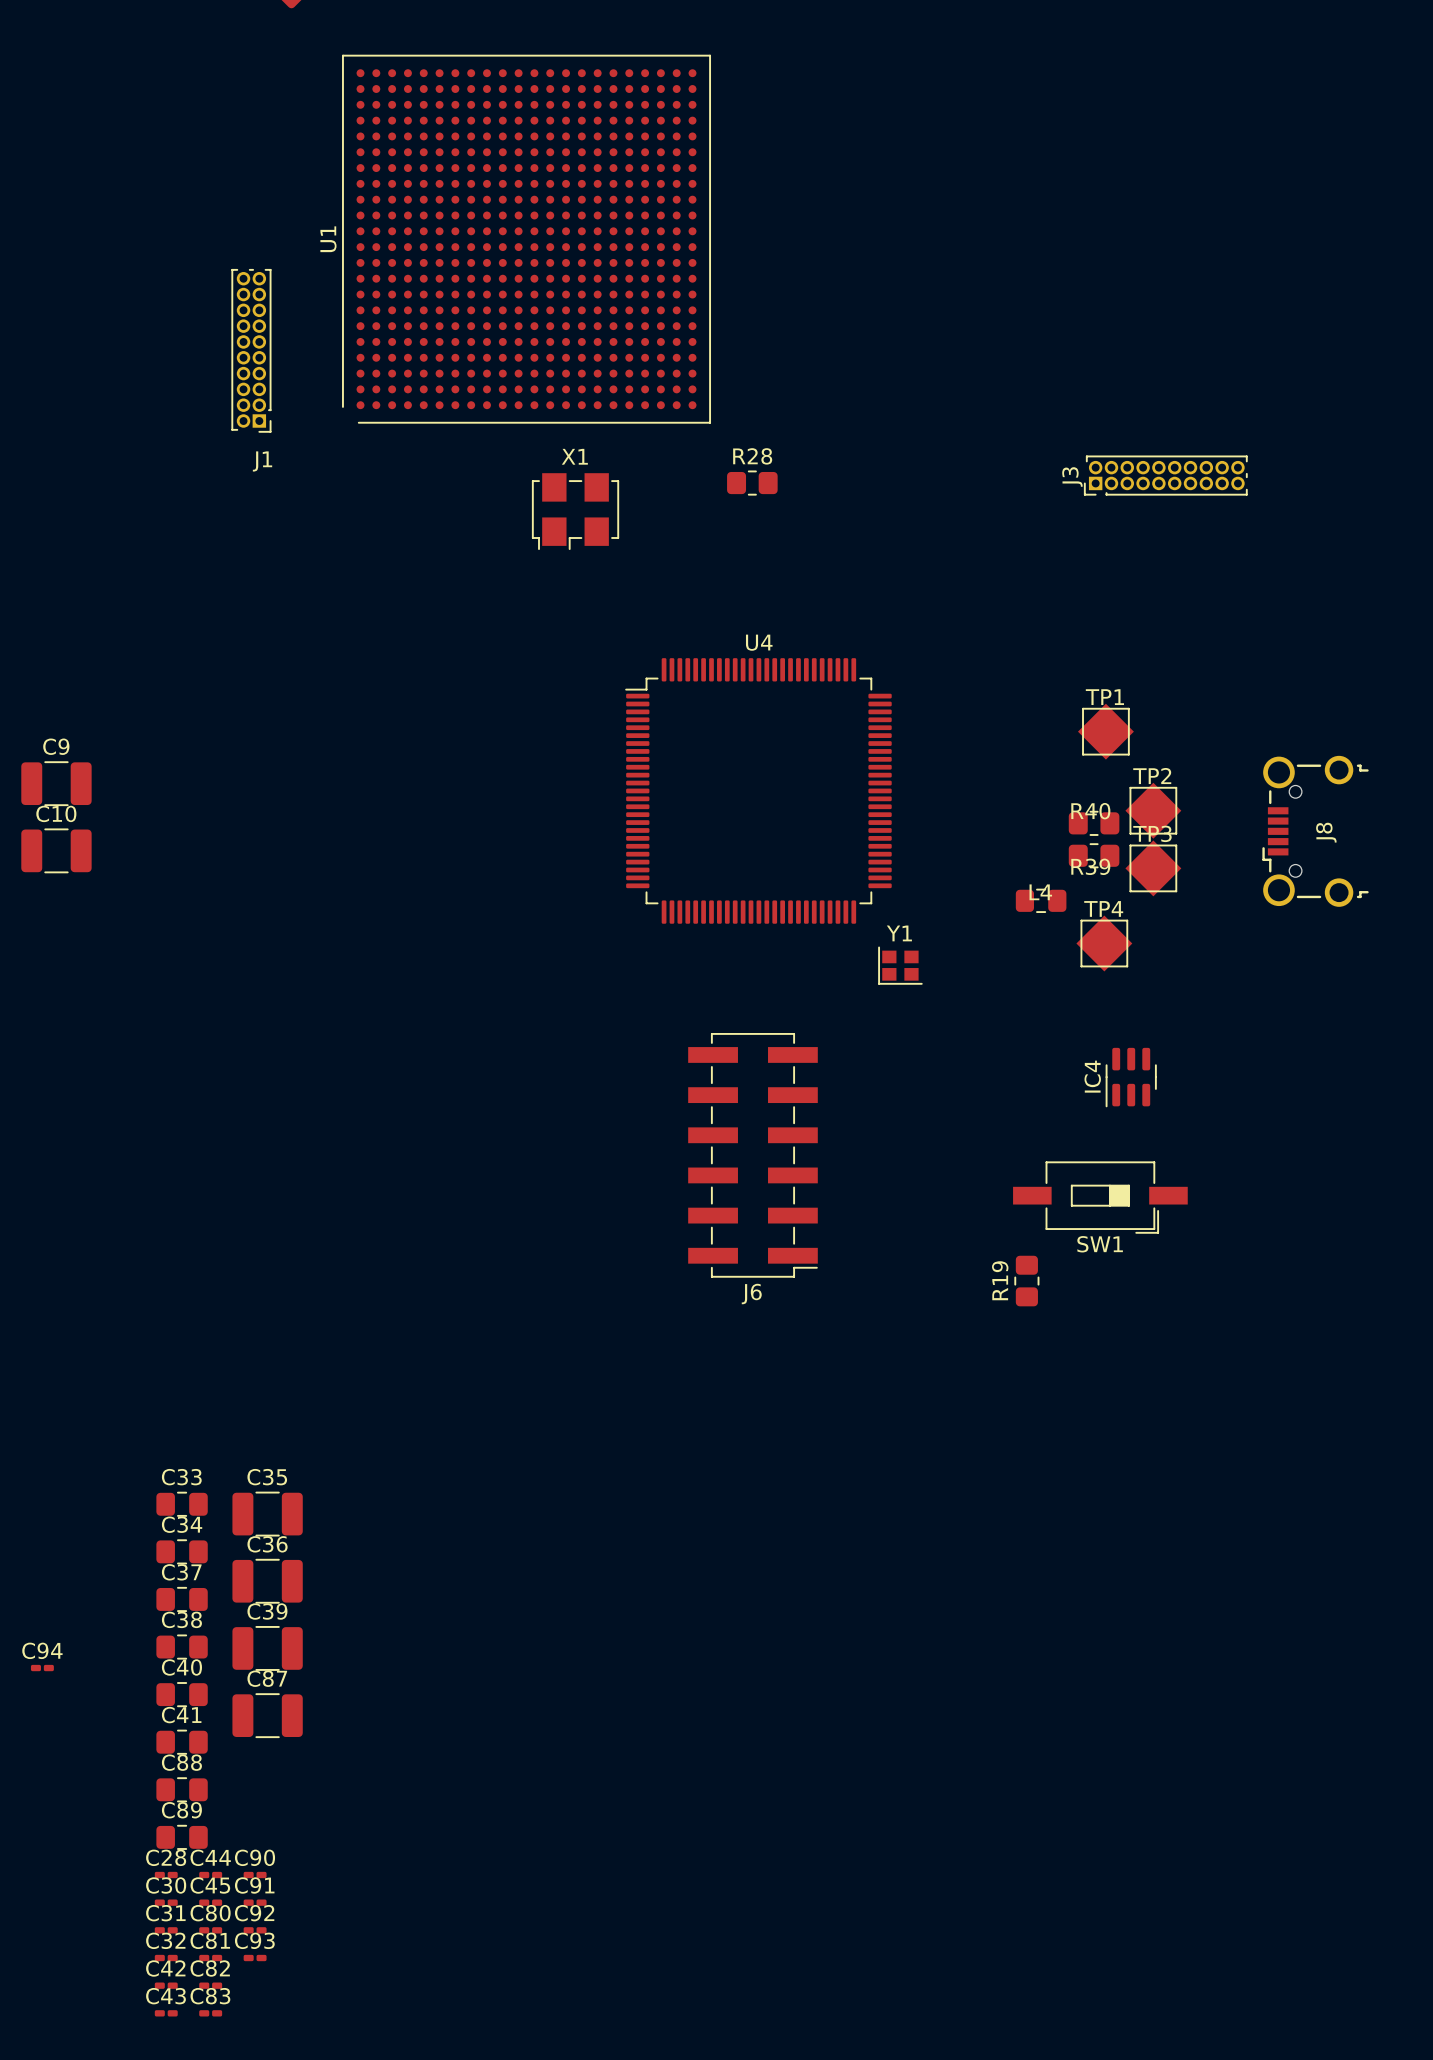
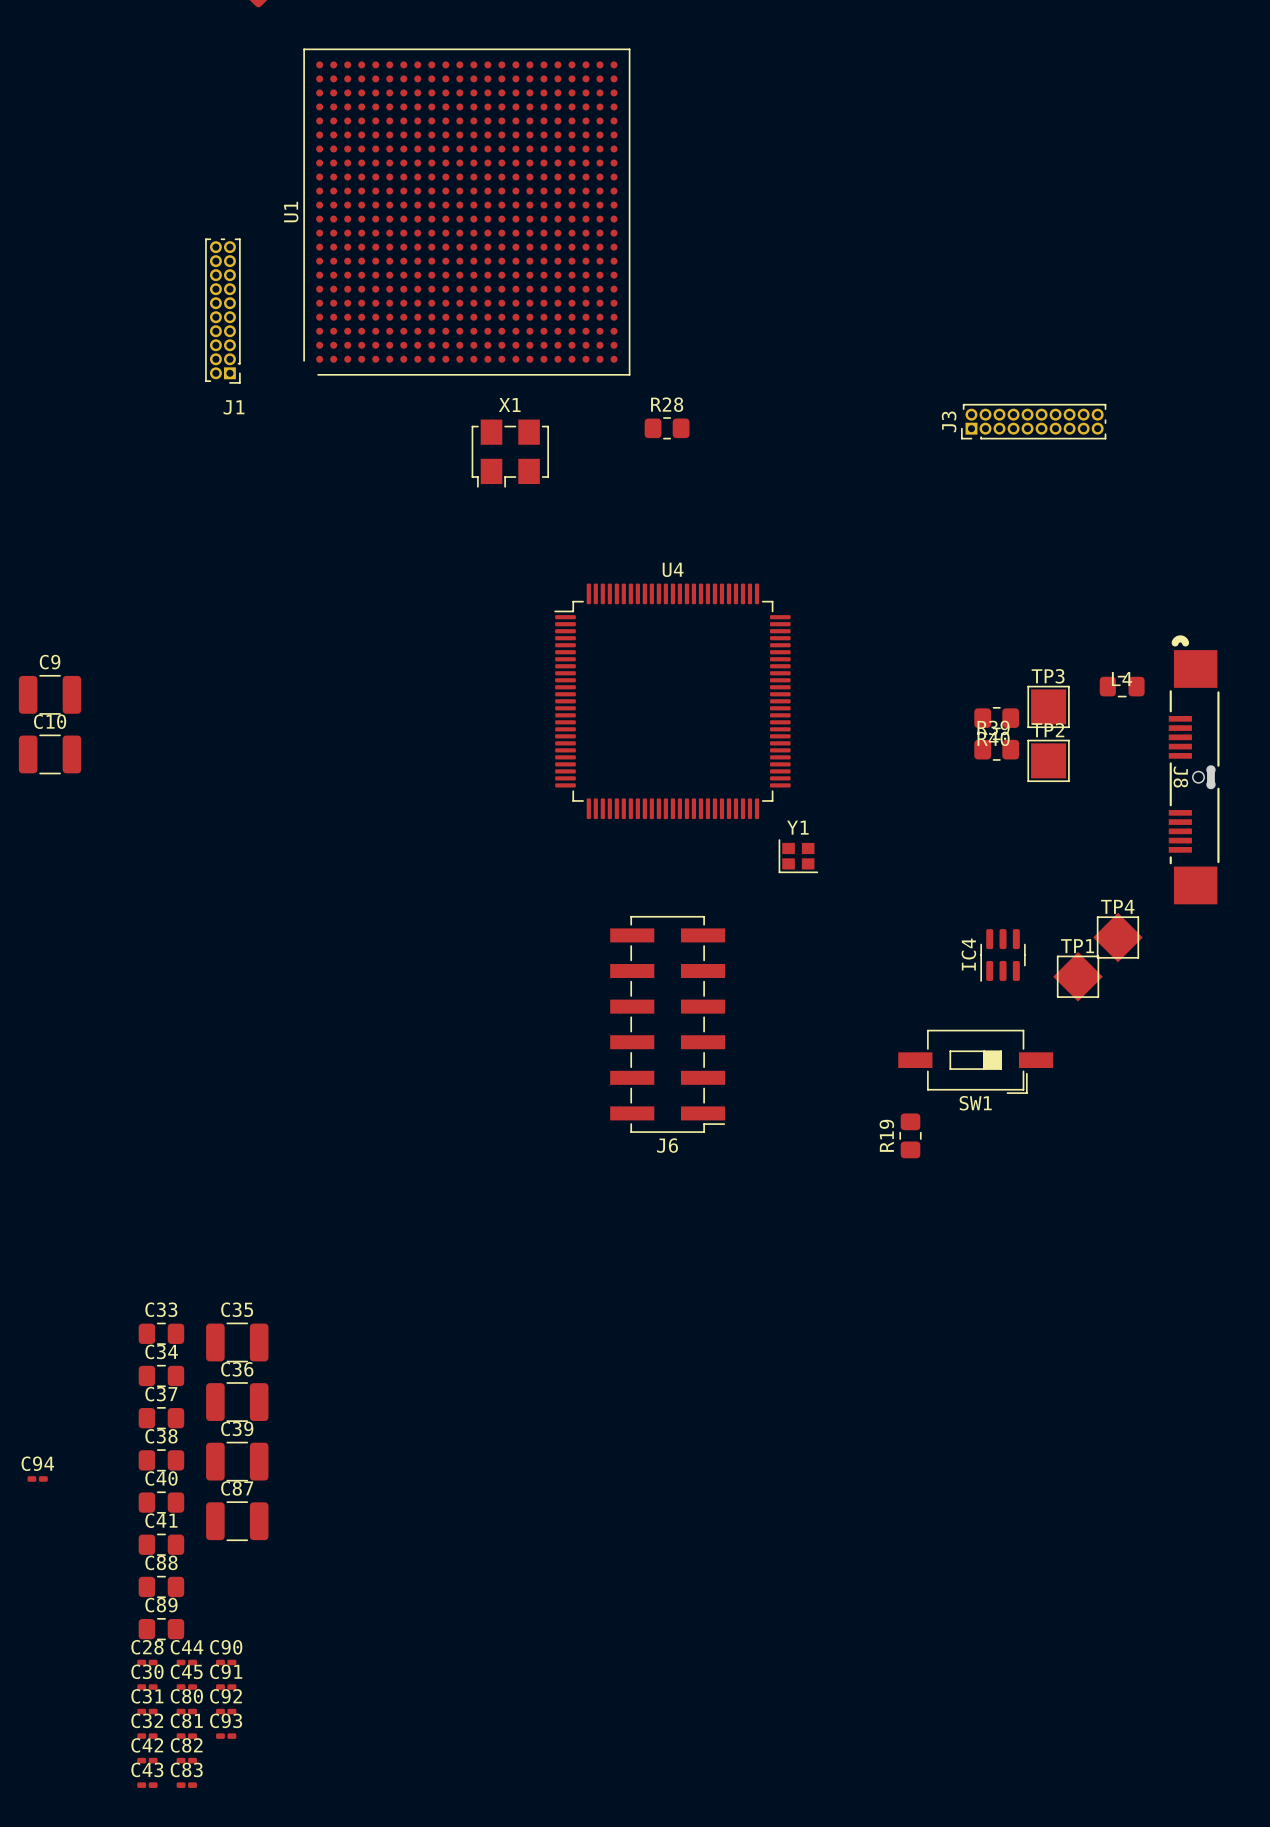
TP1 position: (1105, 731) -> (1078, 976)
J8 footprint: [1262, 755, 1369, 907] -> [1168, 635, 1220, 905]
TP2 footprint: [1125, 782, 1182, 839] -> [1027, 739, 1070, 783]
R40 position: (1094, 823) -> (996, 749)
TP3 footprint: [1125, 840, 1182, 897] -> [1027, 685, 1070, 729]
R39 position: (1094, 855) -> (996, 718)
L4 position: (1041, 900) -> (1122, 686)
TP4 position: (1104, 943) -> (1117, 937)

